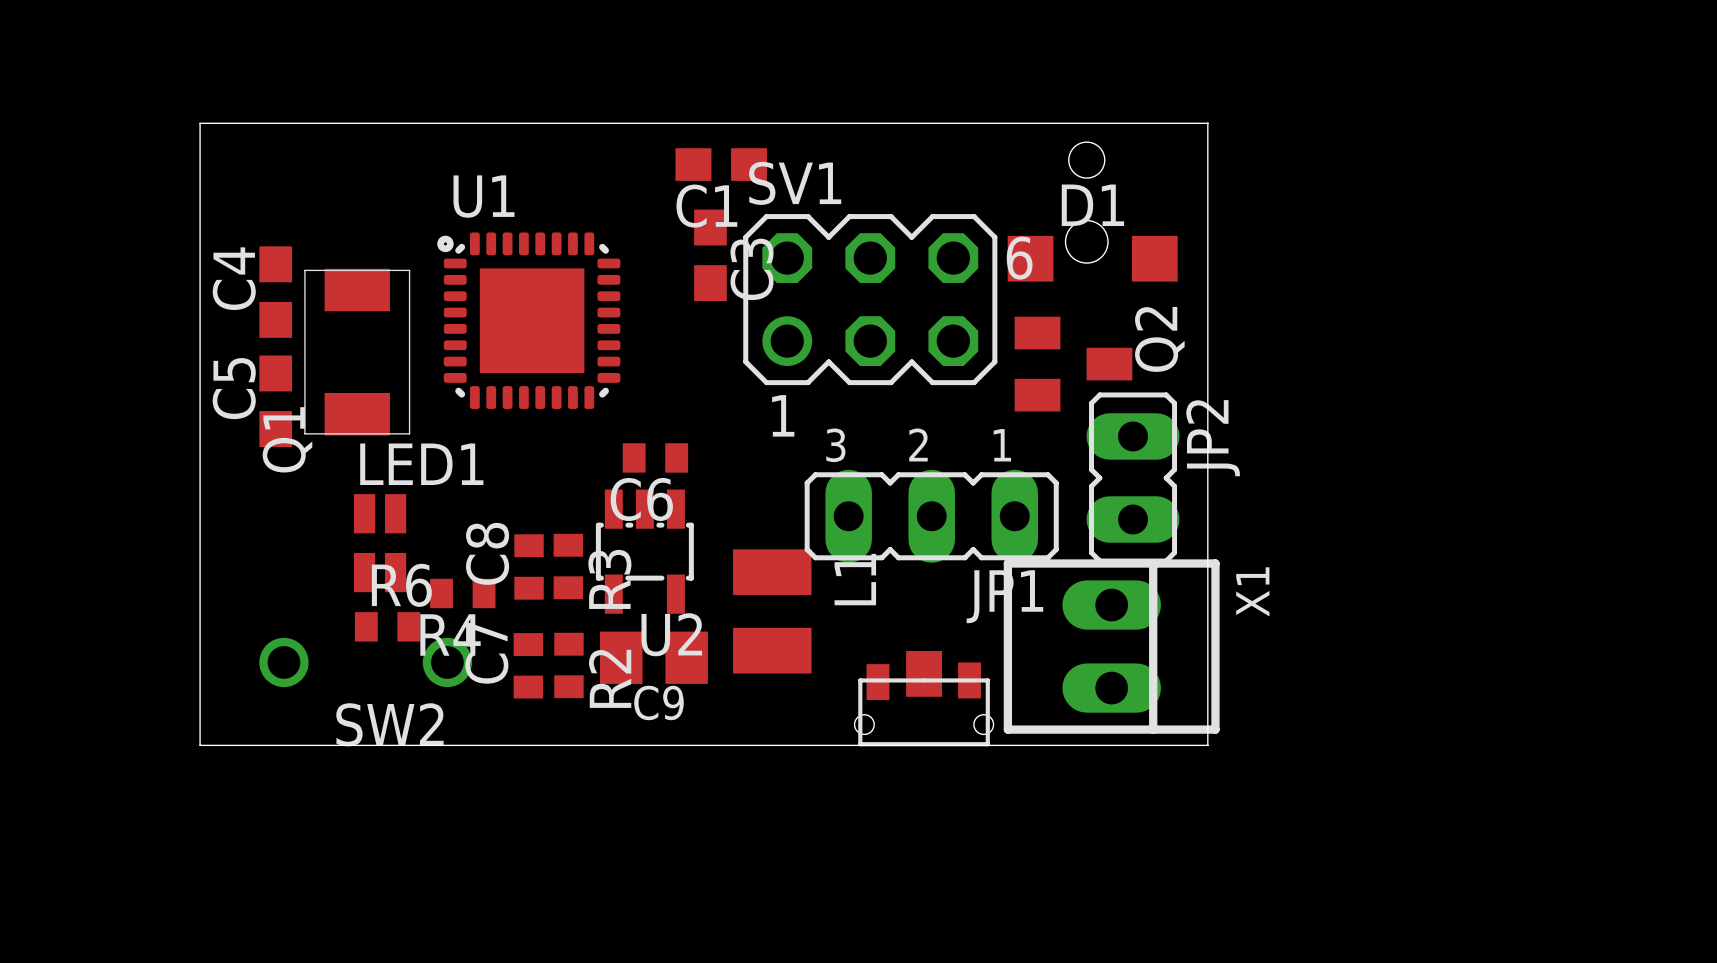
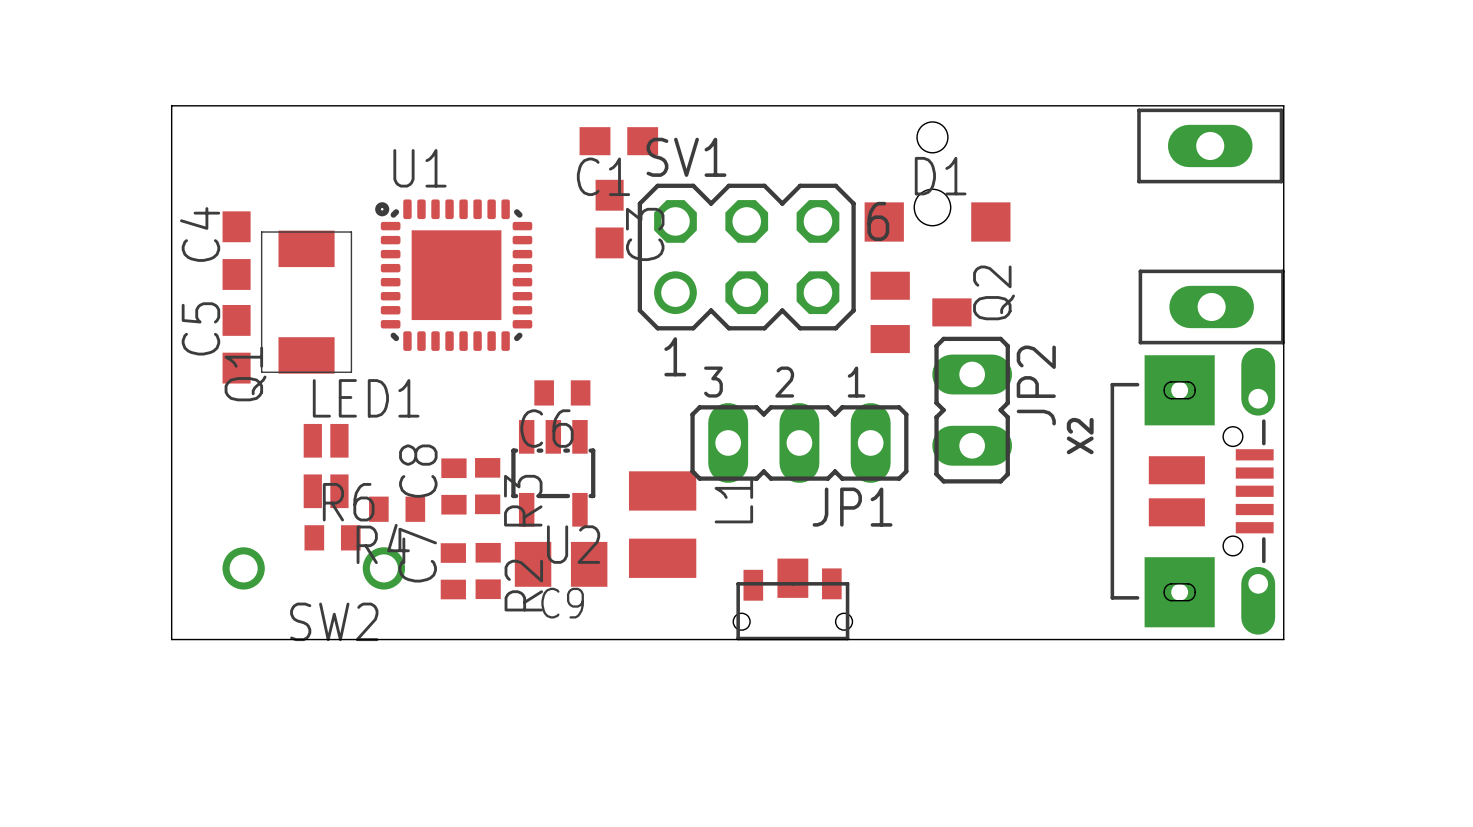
board edge: (1207, 123) (1207, 745) -> (1036, 105) (1283, 105) (1283, 639) (1036, 639)
part: none -> (1210, 145)
part: none -> (1211, 306)
X2: none -> (1192, 491)
X1: (1111, 646) -> none

